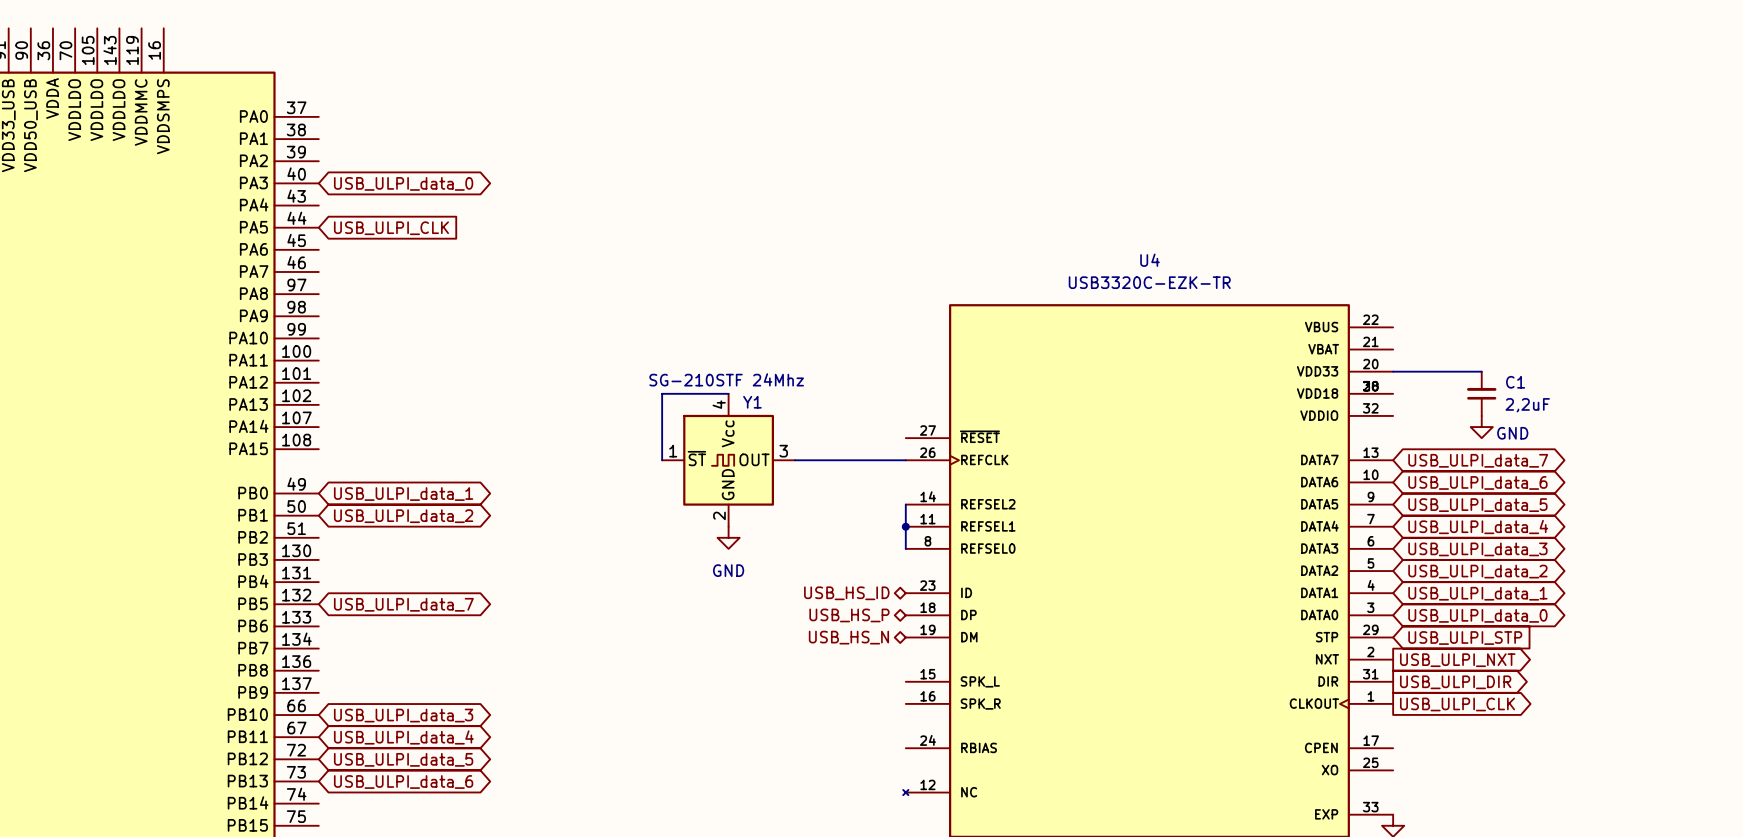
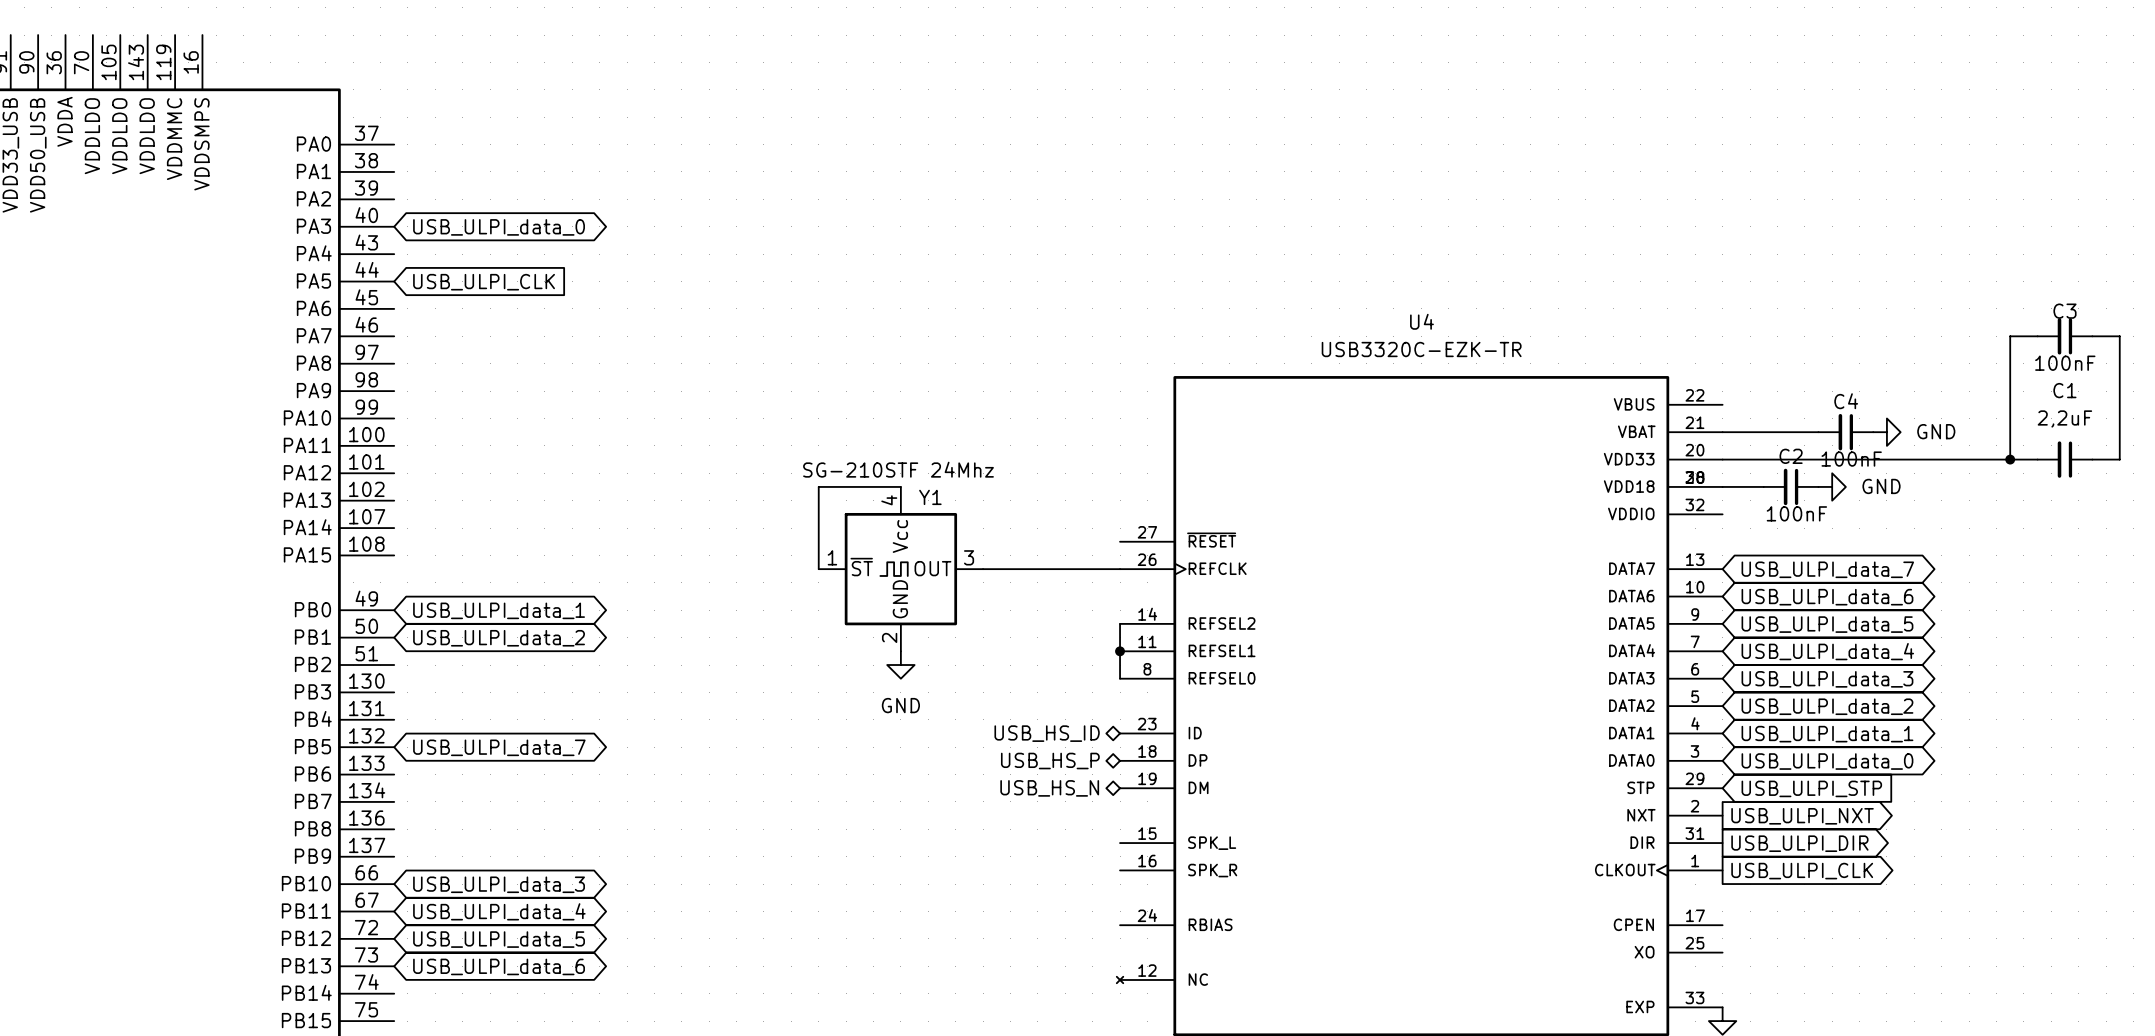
wire: none -> (2037, 336) (2010, 336) (2010, 459)
C3: none -> 100nF (2064, 336)
wire: none -> (2092, 336) (2119, 336) (2119, 459) (2092, 459)
wire: none -> (1722, 432) (1818, 432)
C4: none -> 100nF (1845, 432)
power symbol: none -> GND (1886, 432)
wire: none -> (1832, 459) (2037, 459)
junction: none -> (2010, 459)
C1 name position: C1 (1515, 382) -> C1 (2064, 390)
wire: none -> (1722, 486) (1763, 486)
C2: none -> 100nF (1791, 486)
C1 rotation: 0° (1481, 393) -> 90° counterclockwise (2064, 459)
C1 position: (1481, 393) -> (2064, 459)
C1 value position: 2,2uF (1527, 405) -> 2,2uF (2064, 418)
power symbol rotation: 0° (1481, 427) -> 90° counterclockwise (1832, 486)
power symbol position: GND (1481, 427) -> GND (1832, 486)

